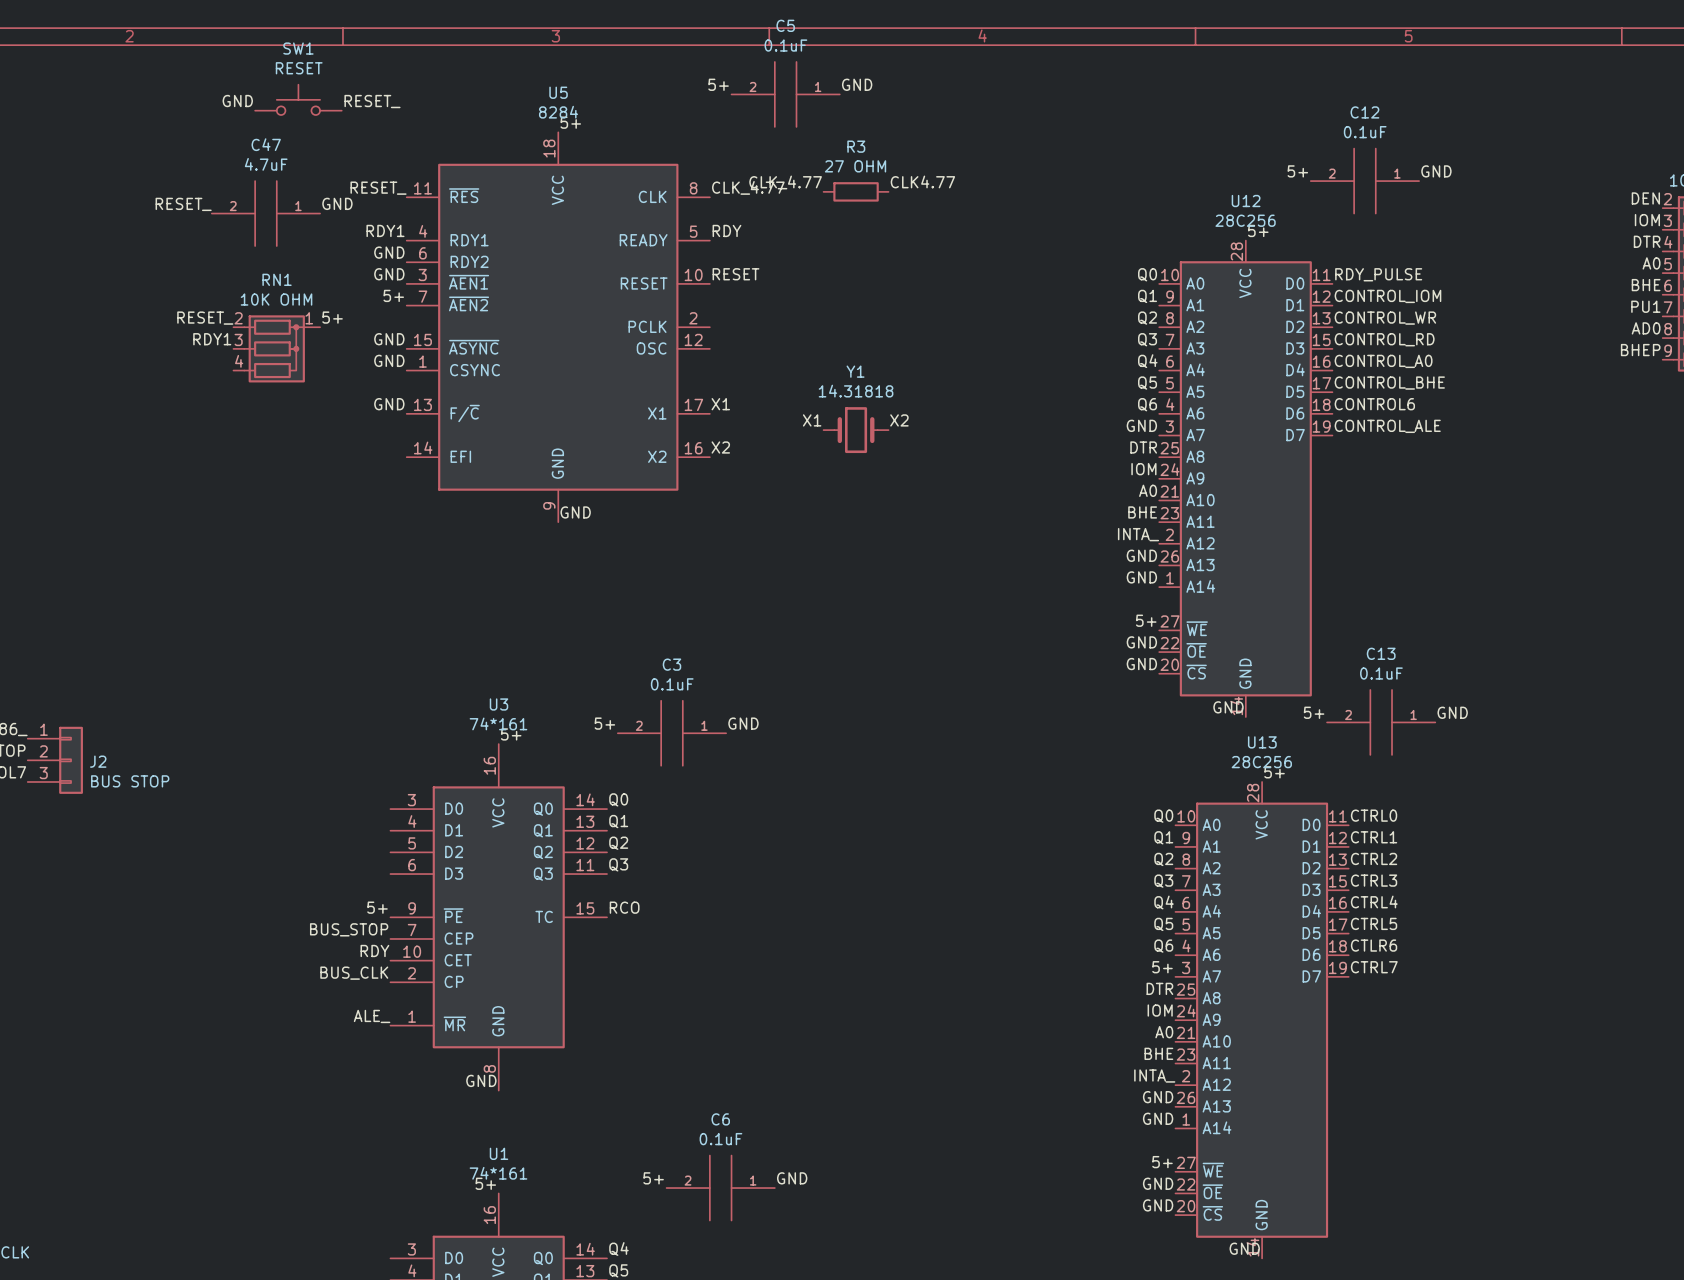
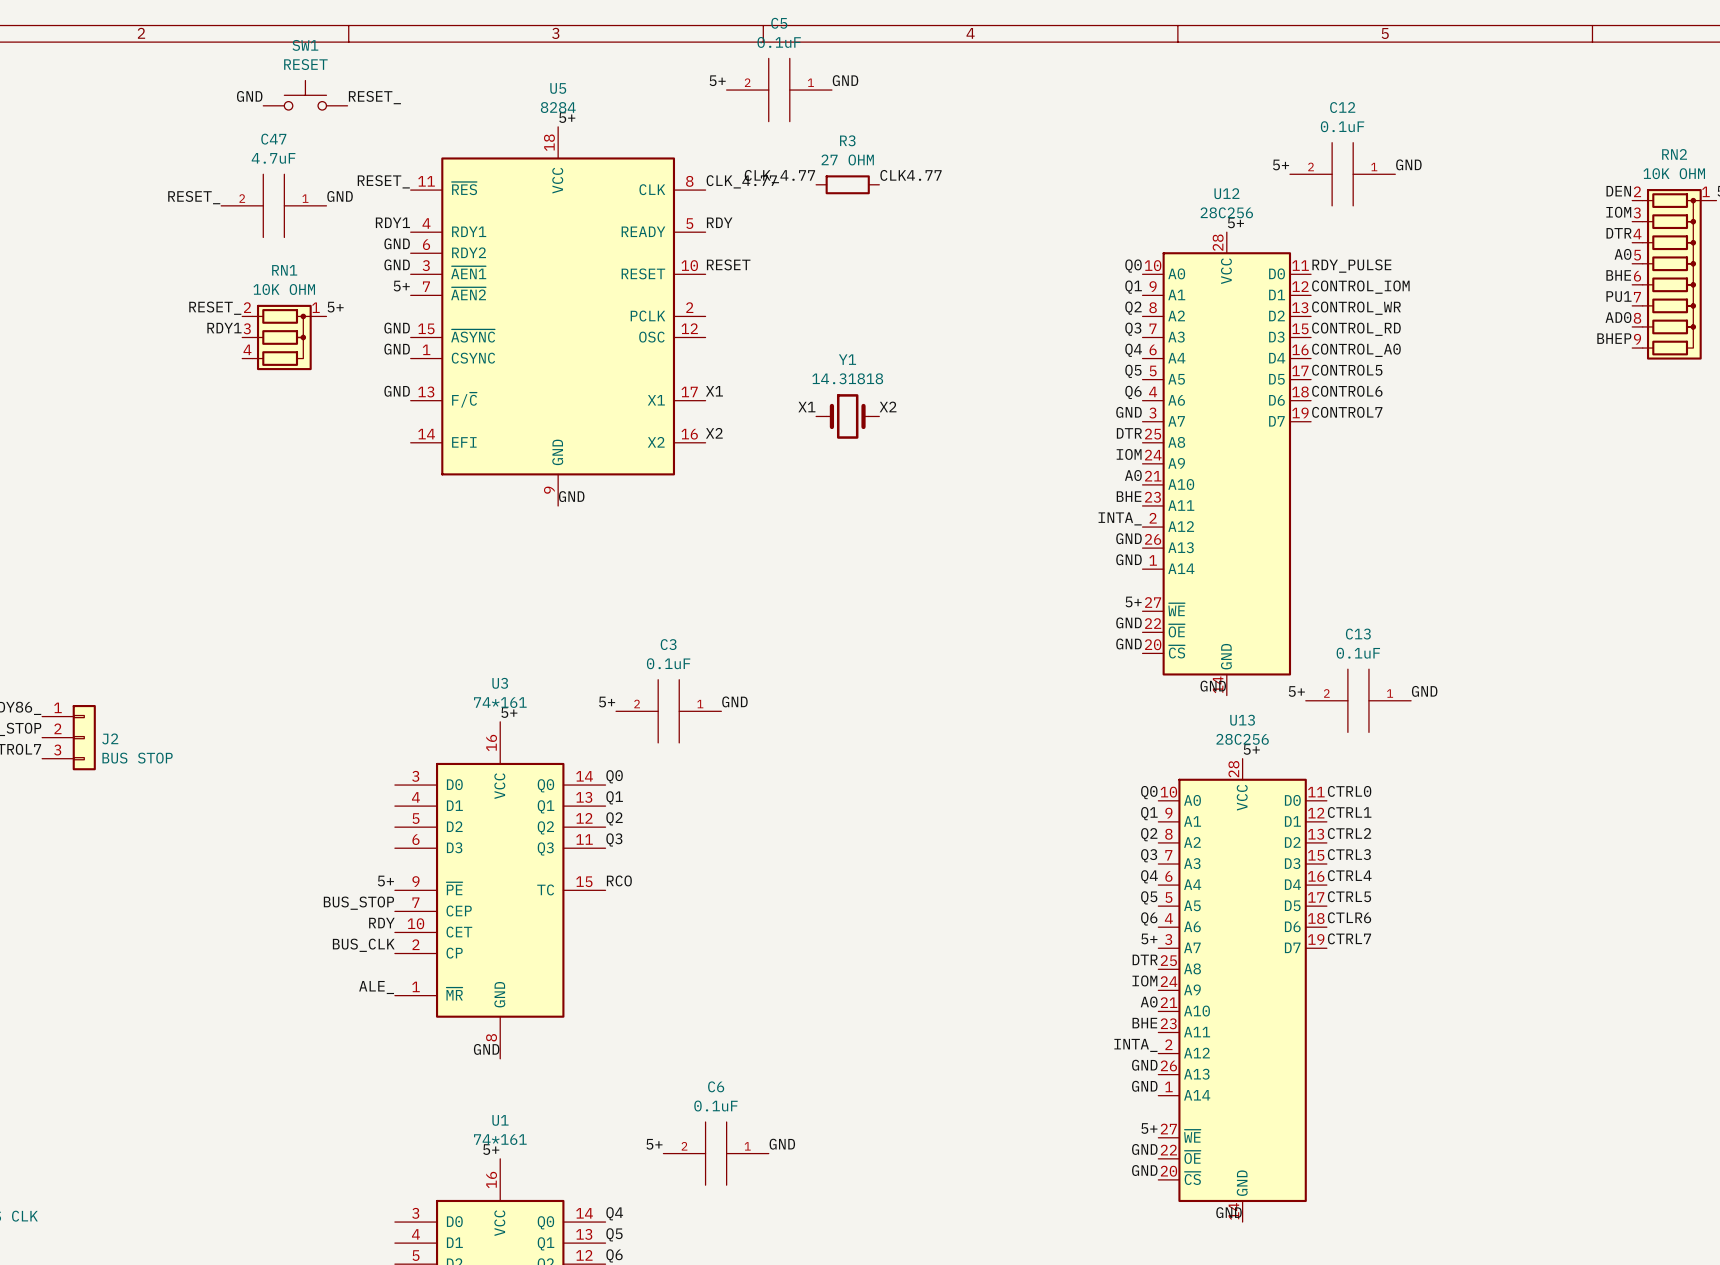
label: CONTROL_BHE (1389, 383) -> CONTROL5 (1347, 370)
label: CONTROL_ALE (1387, 426) -> CONTROL7 (1347, 412)

